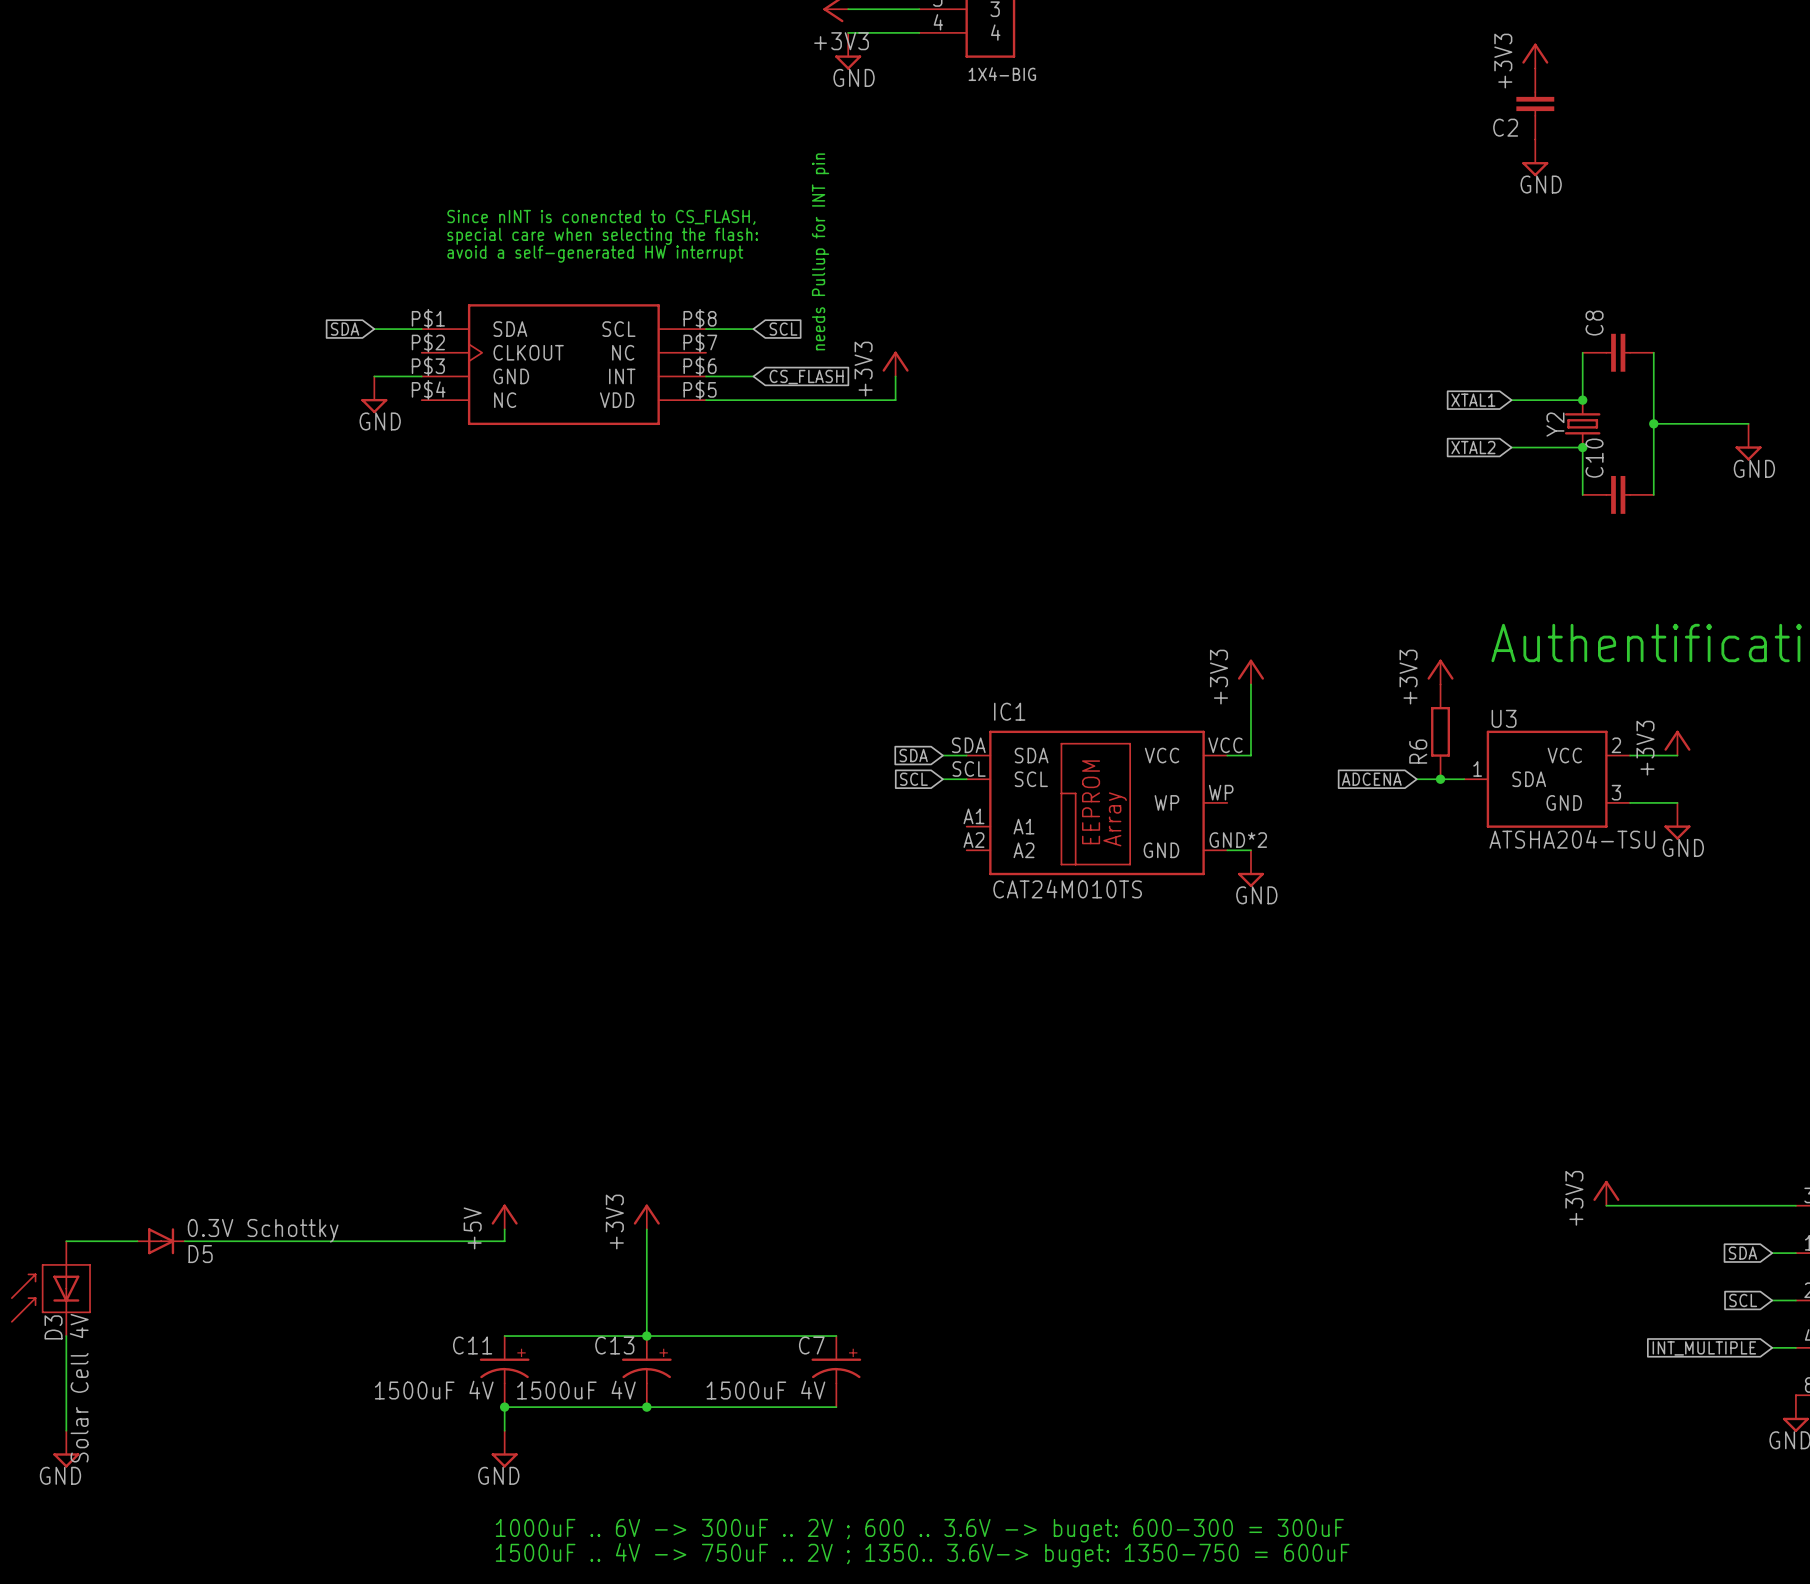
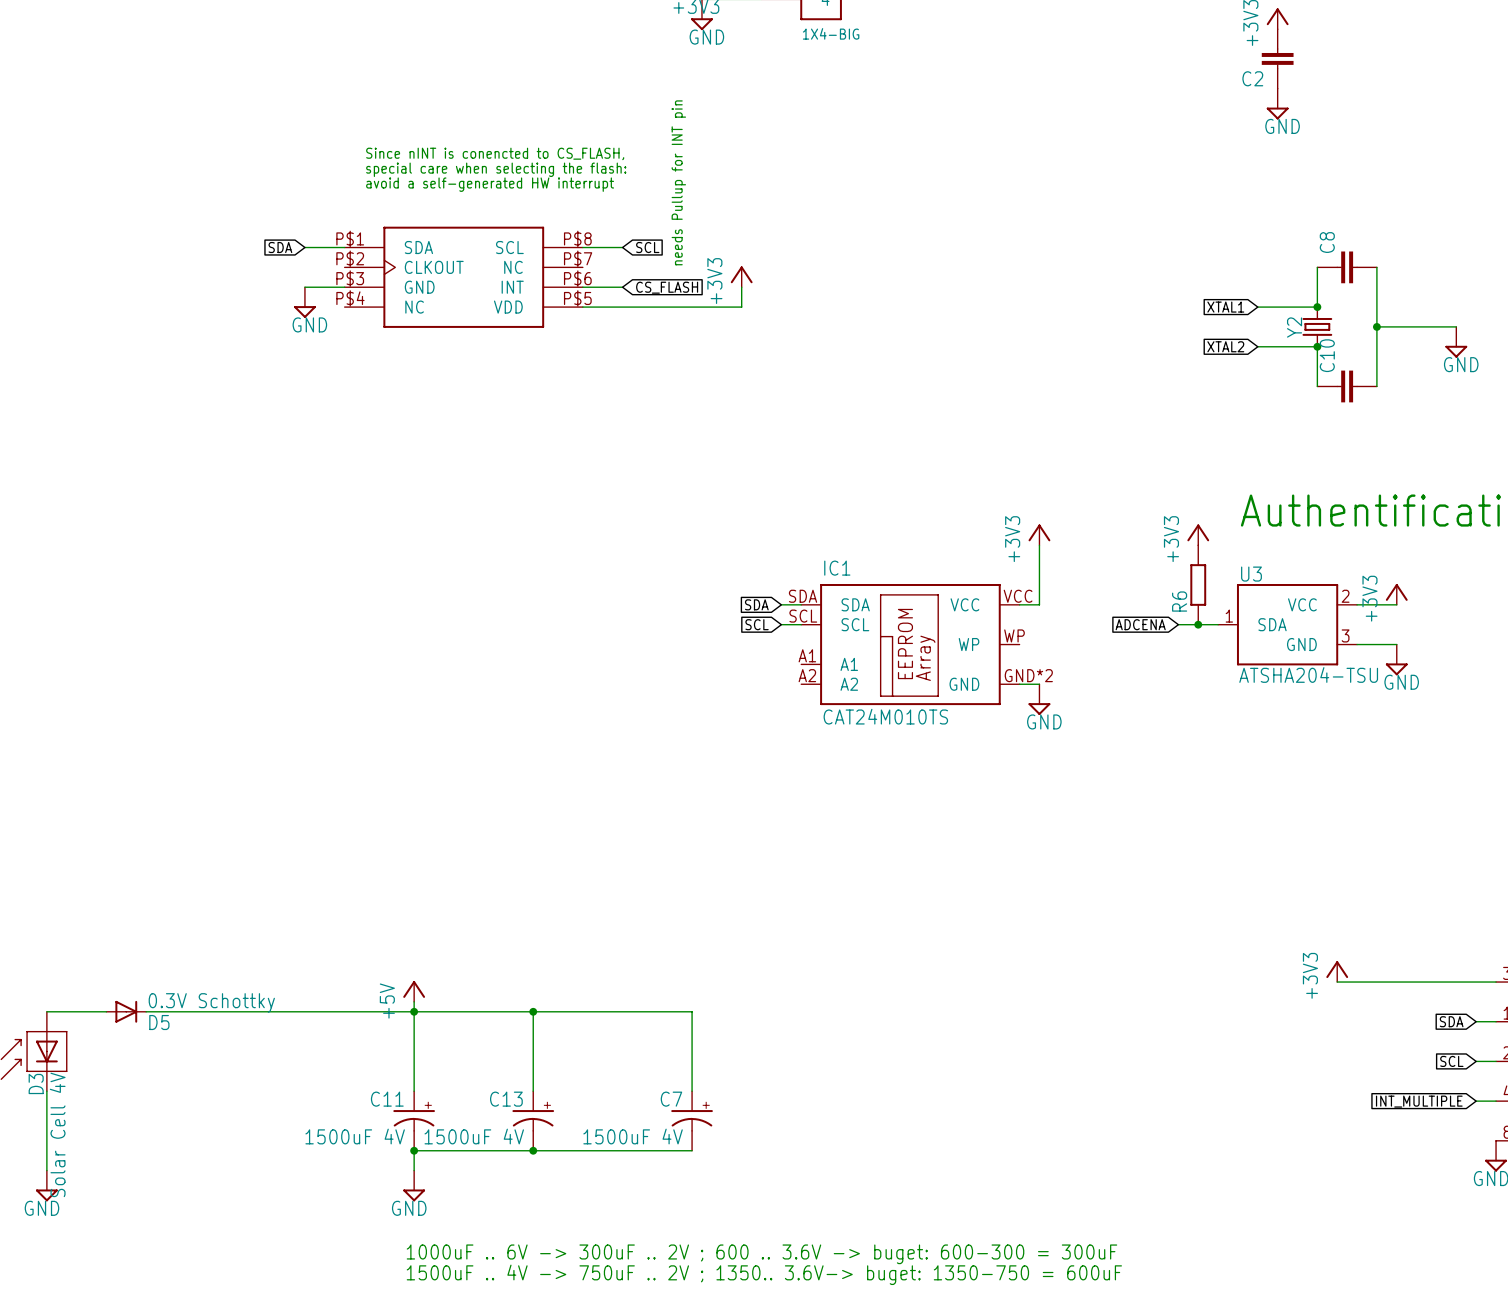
power symbol: +3V3 (646, 1216) -> none
wire: (646, 1229) (646, 1241) -> none
junction: none -> (414, 1011)
junction: none -> (533, 1011)
wire: (504, 1336) (836, 1336) -> (414, 1091) (414, 1011) (692, 1011) (692, 1091)
junction: (646, 1336) -> none

